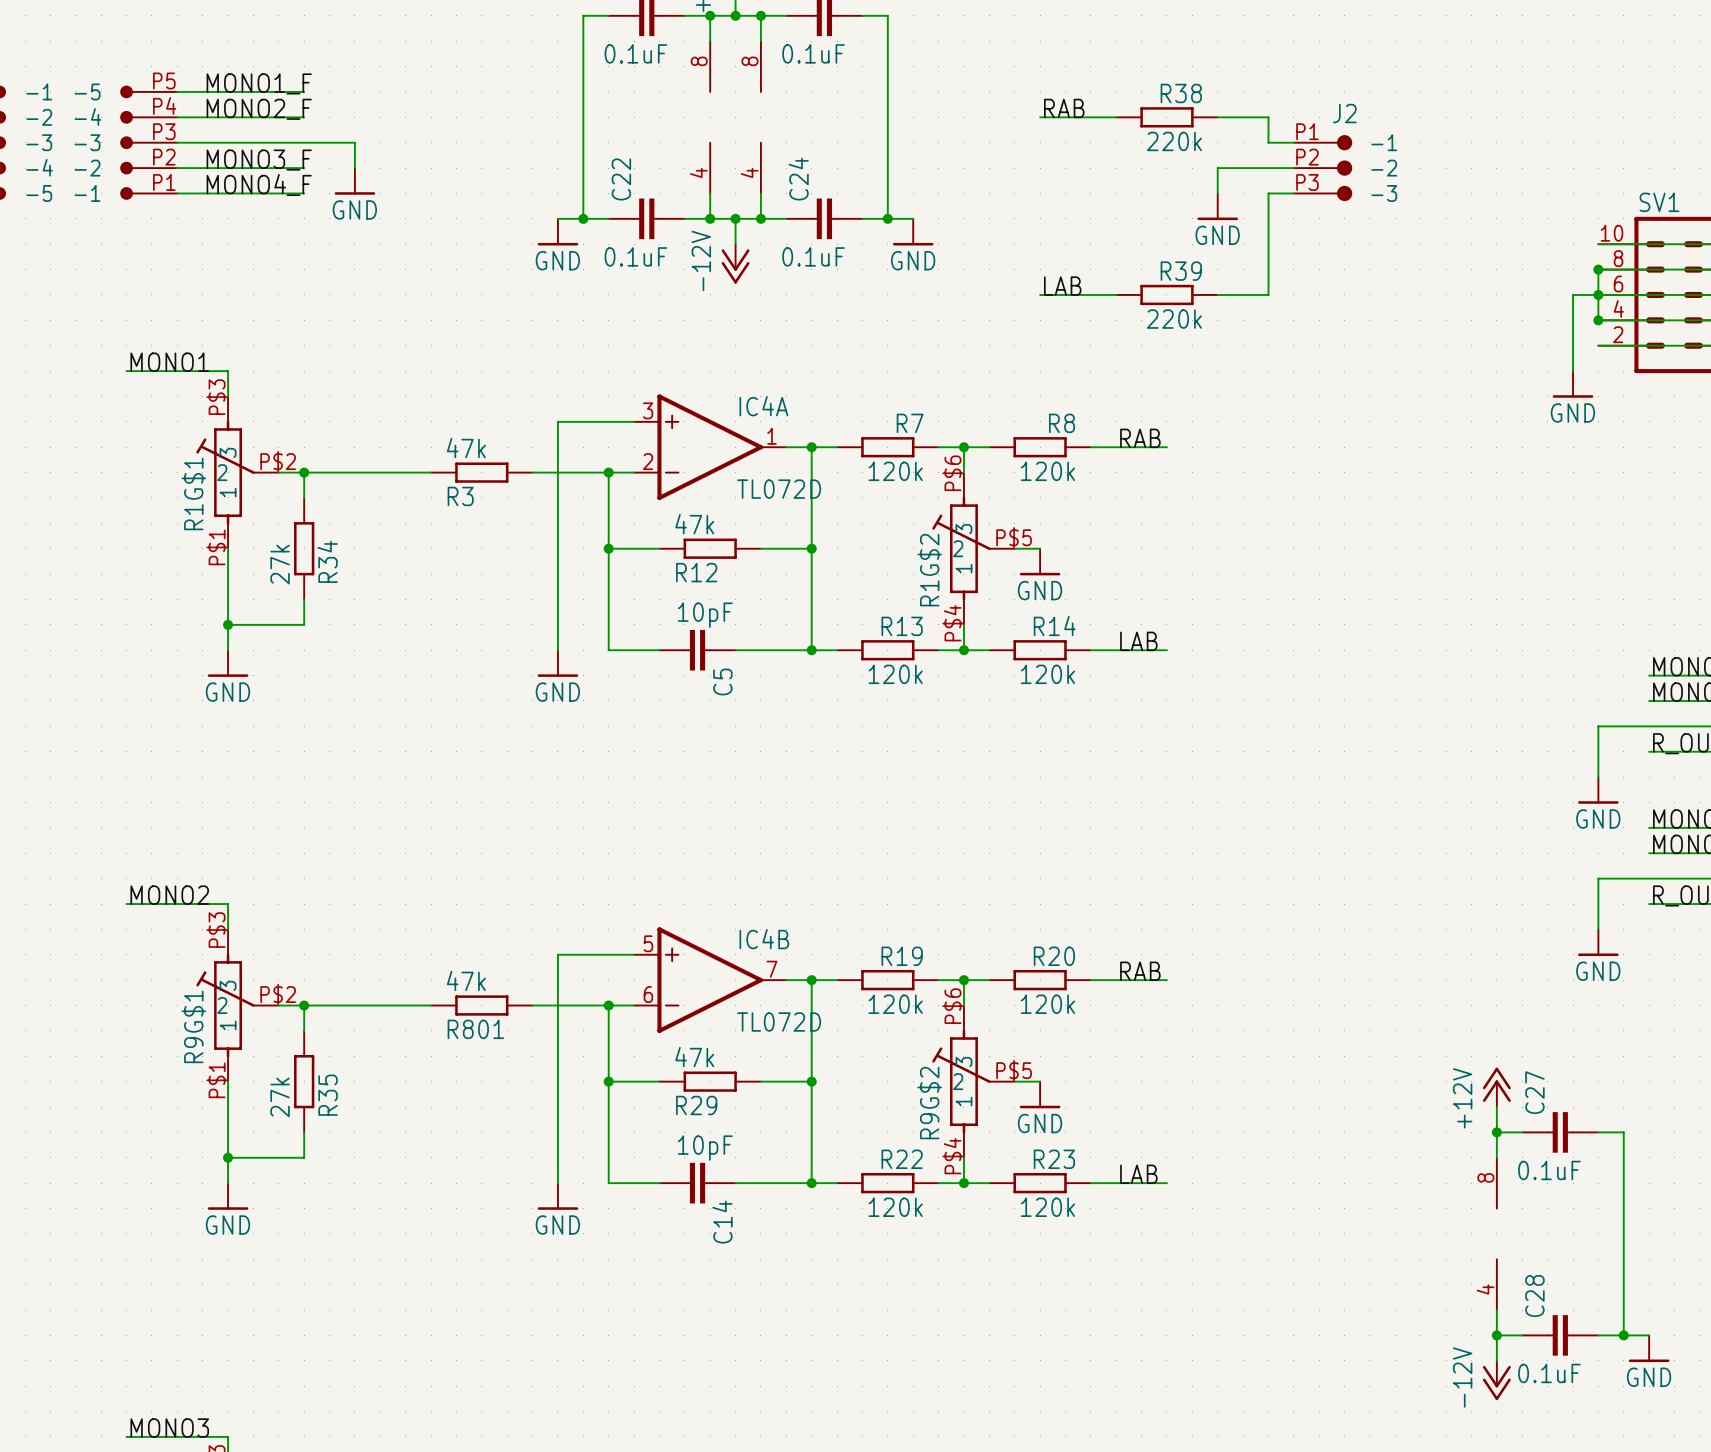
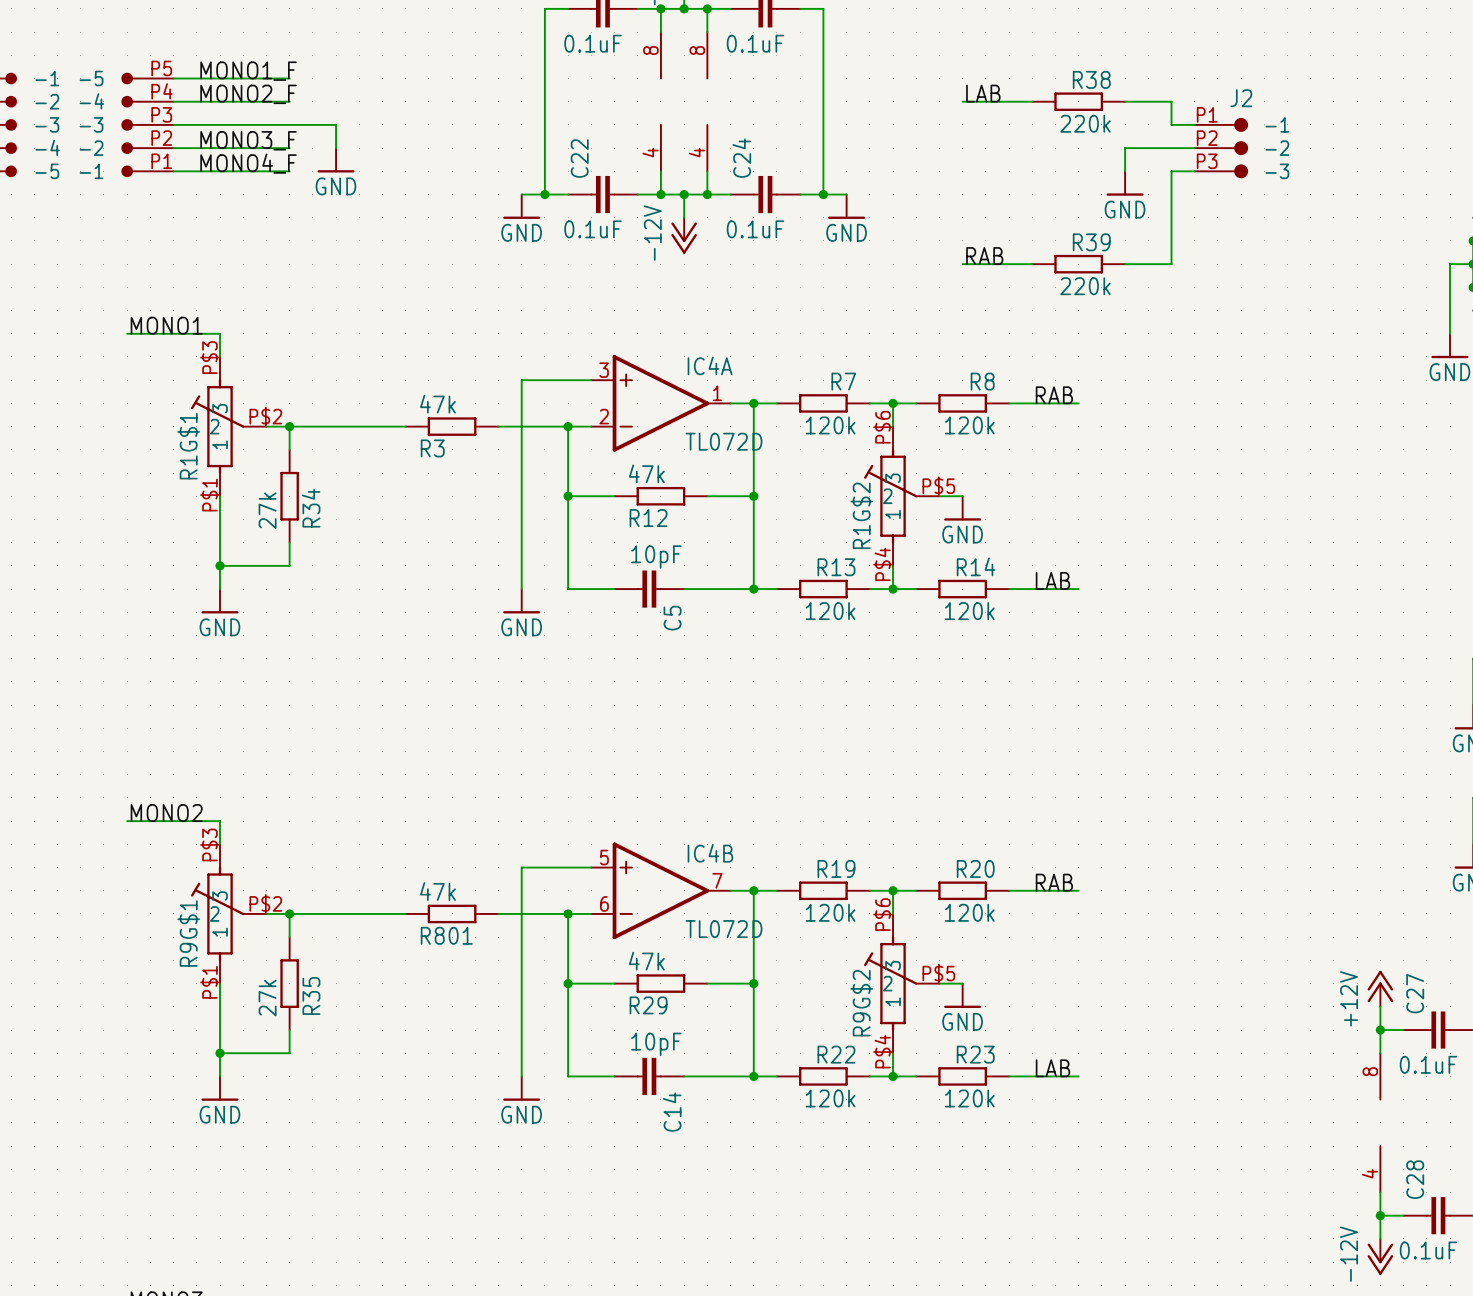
label: RAB (1064, 108) -> LAB (983, 93)
label: LAB (1062, 286) -> RAB (984, 256)

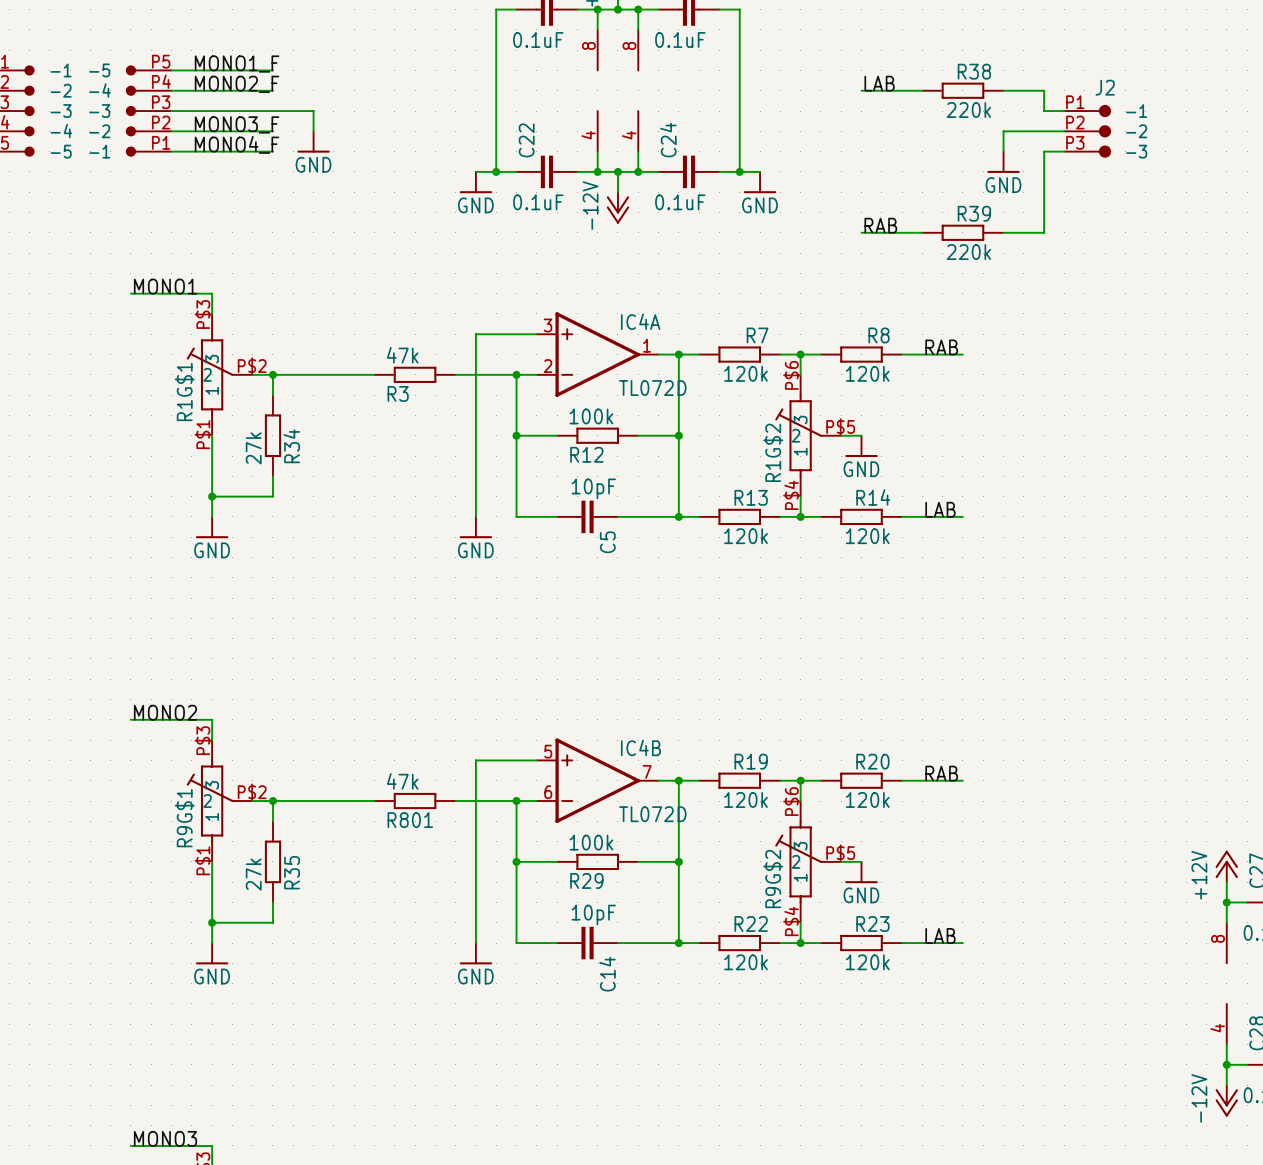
R12 value: 47k (646, 473) -> 100k (591, 416)
R29 value: 47k (646, 961) -> 100k (591, 842)

